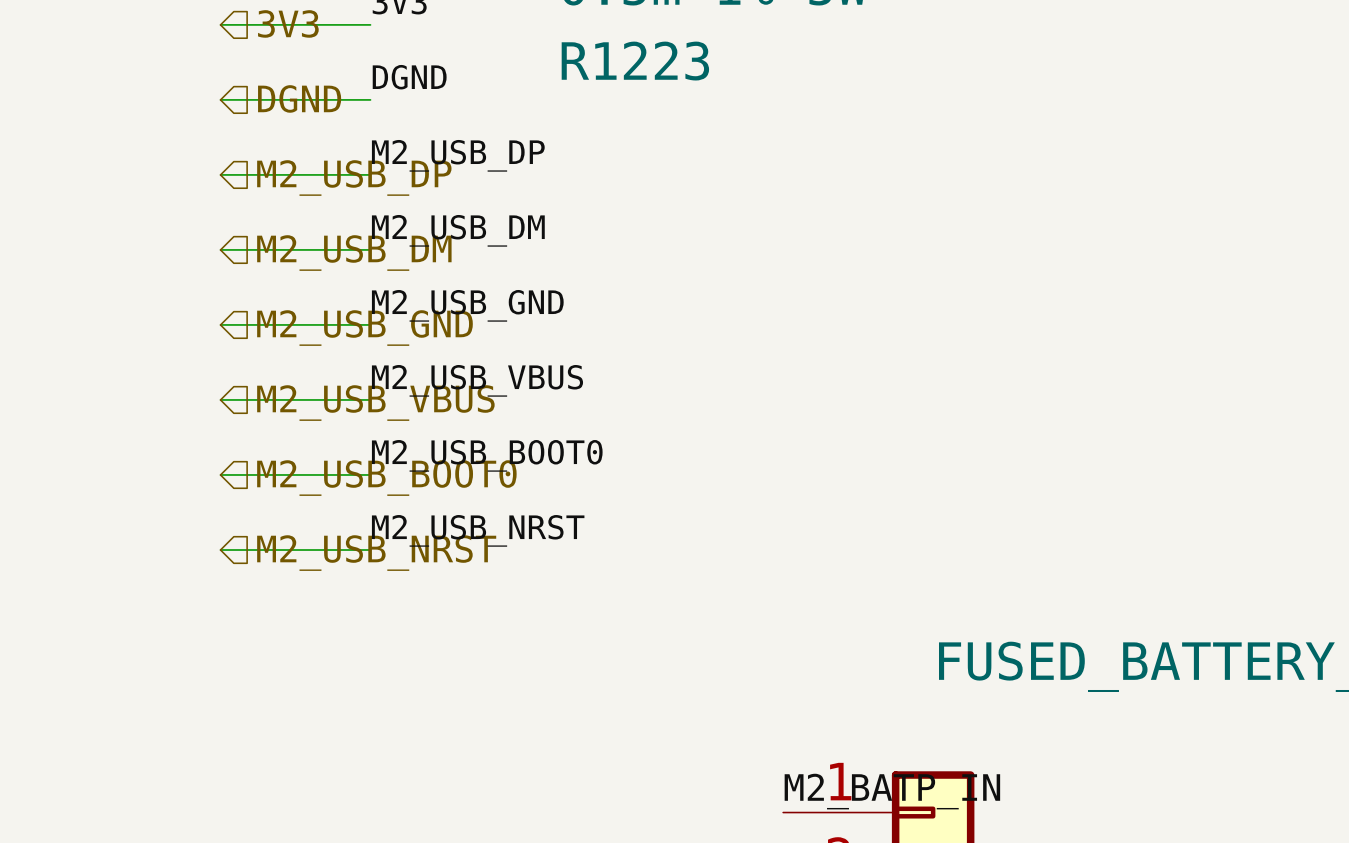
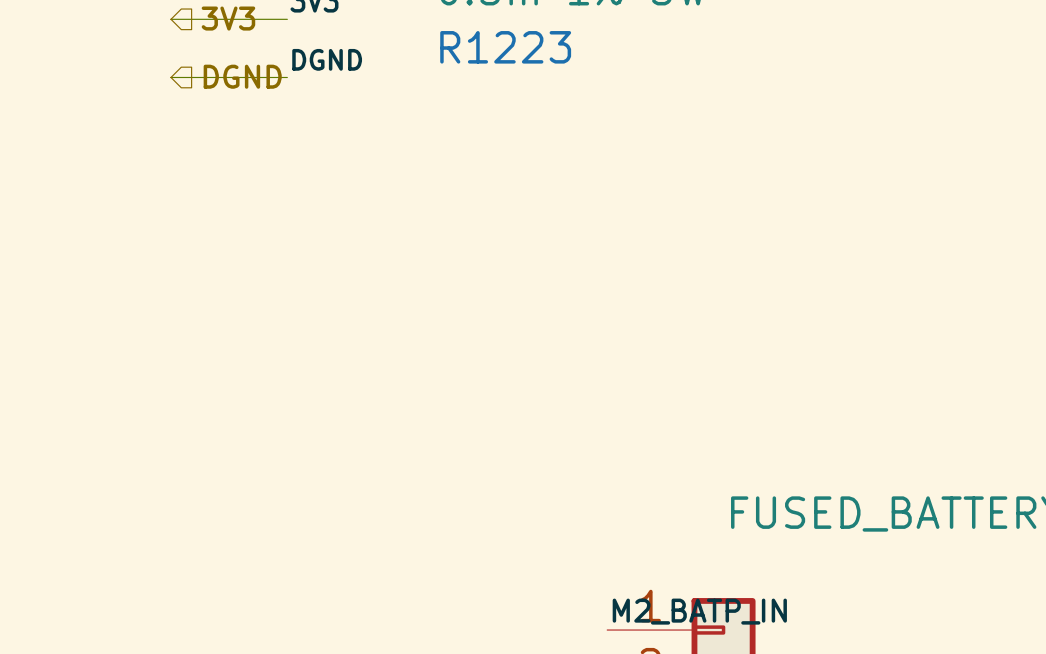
label: M2_USB_DP (458, 155) -> none
wire: (220, 174) (370, 174) -> none
hierarchical label: M2_USB_DP (354, 178) -> none
label: M2_USB_DM (458, 230) -> none
wire: (220, 249) (370, 249) -> none
hierarchical label: M2_USB_DM (354, 253) -> none
label: M2_USB_GND (467, 305) -> none
wire: (220, 324) (370, 324) -> none
hierarchical label: M2_USB_GND (364, 328) -> none
label: M2_USB_VBUS (477, 380) -> none
wire: (220, 399) (370, 399) -> none
hierarchical label: M2_USB_VBUS (375, 403) -> none
label: M2_USB_BOOT0 (487, 455) -> none
wire: (220, 474) (370, 474) -> none
hierarchical label: M2_USB_BOOT0 (386, 478) -> none
label: M2_USB_NRST (478, 530) -> none
wire: (220, 550) (370, 550) -> none
hierarchical label: M2_USB_NRST (376, 553) -> none

